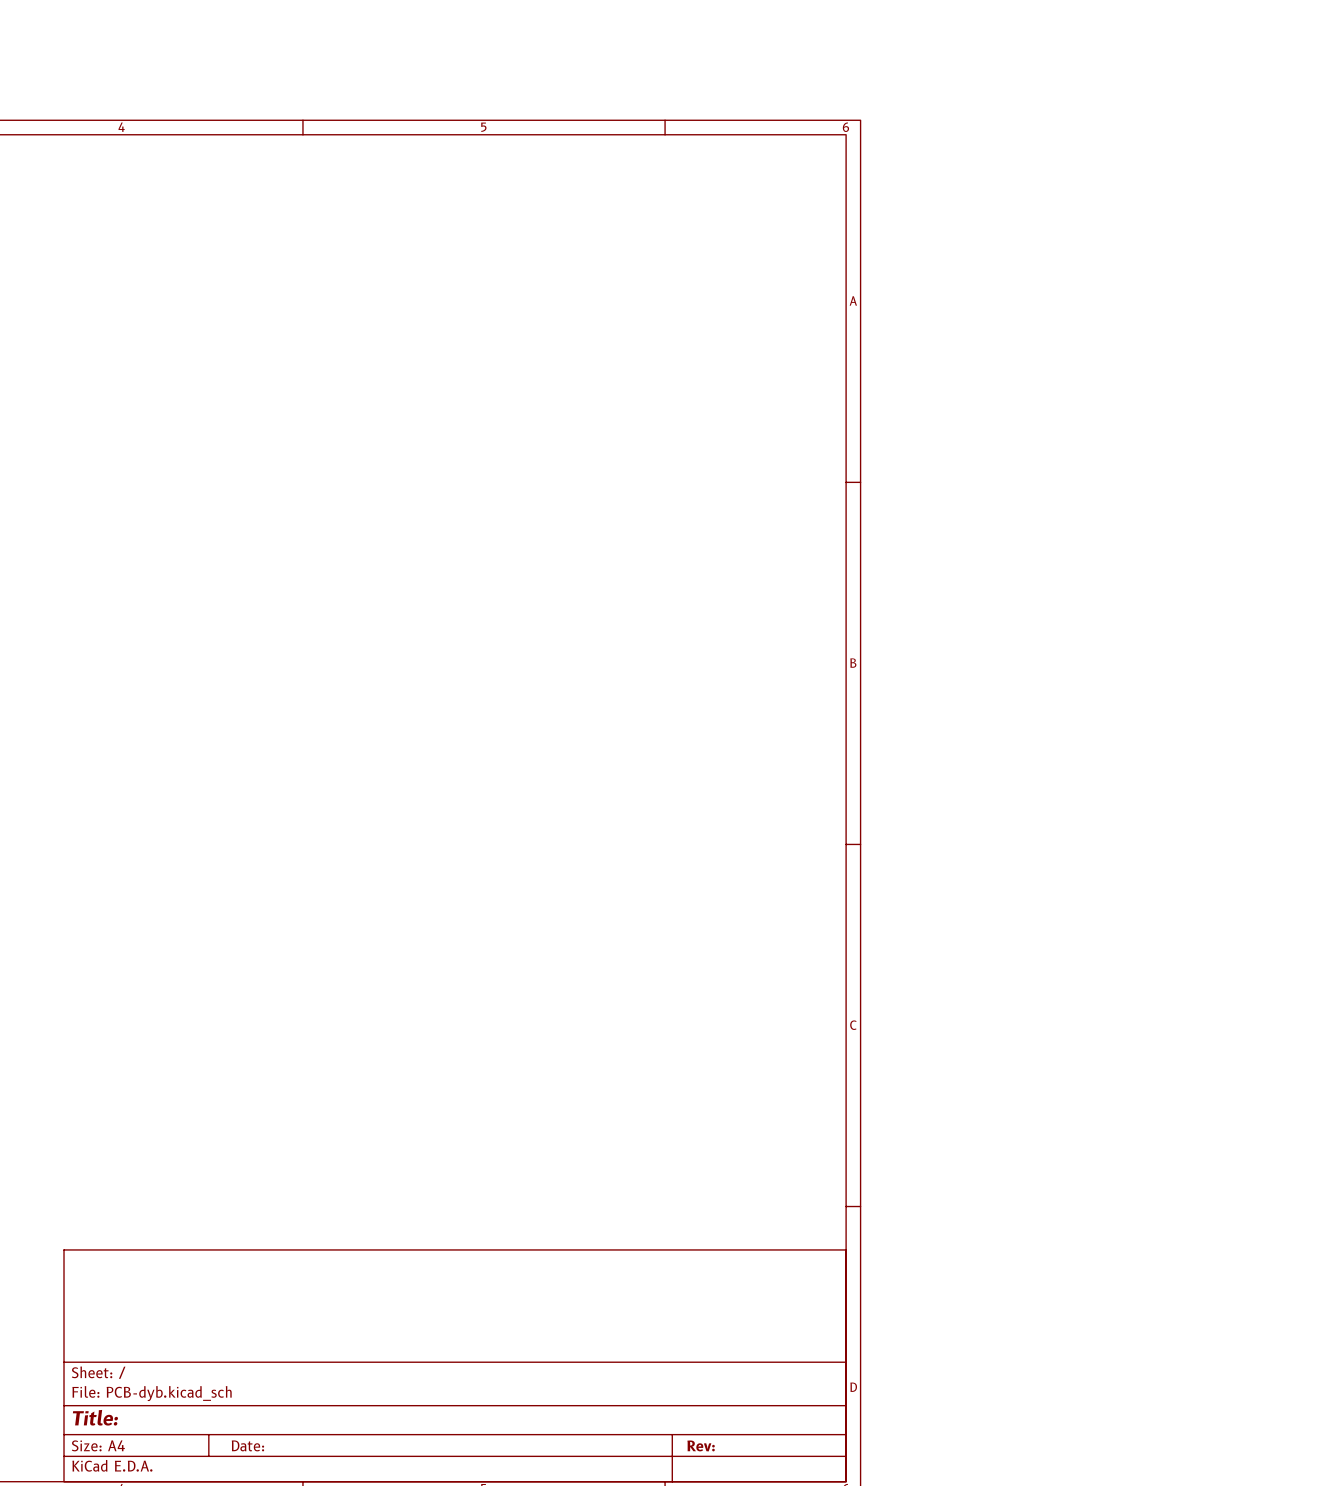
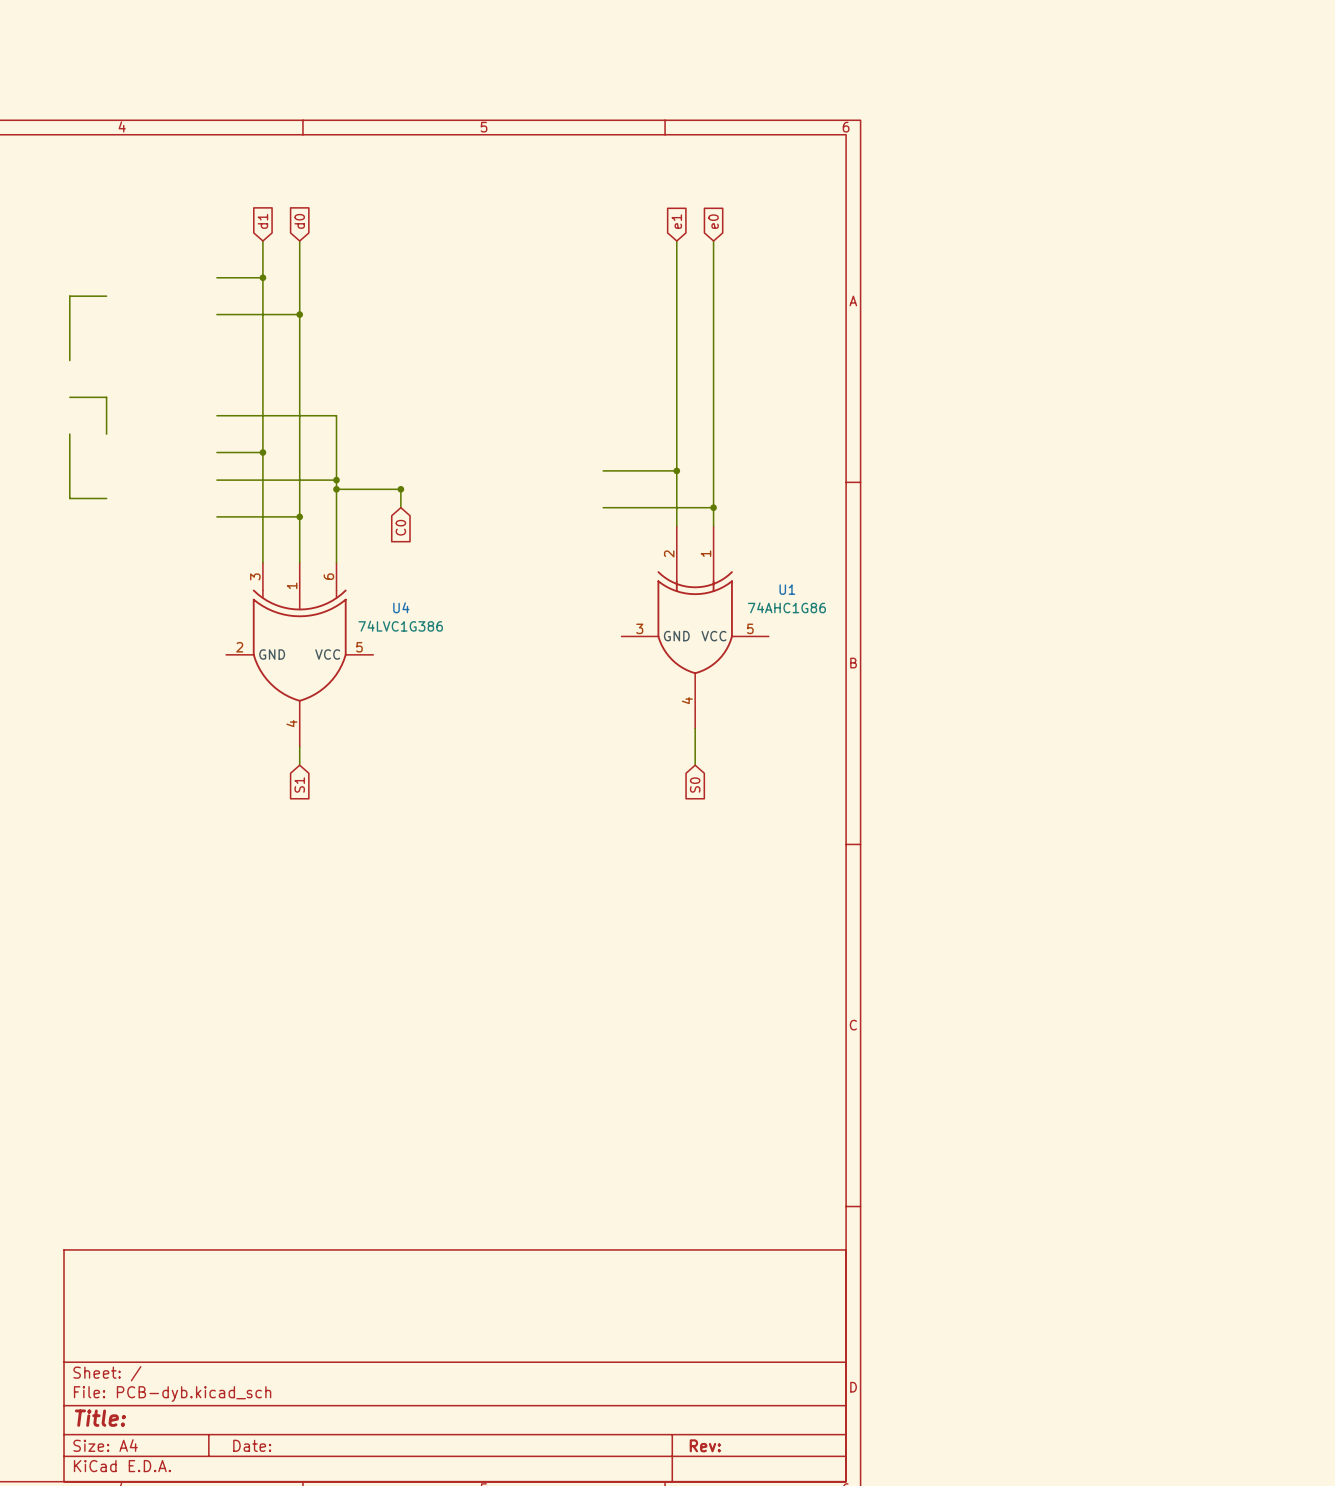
global label: none -> d1 (262, 221)
global label: none -> d0 (299, 221)
global label: none -> e1 (676, 221)
global label: none -> e0 (713, 221)
wire: none -> (262, 240) (262, 562)
wire: none -> (299, 240) (299, 562)
wire: none -> (676, 240) (676, 526)
wire: none -> (713, 240) (713, 526)
wire: none -> (216, 277) (262, 277)
junction: none -> (262, 277)
wire: none -> (106, 296) (69, 296) (69, 360)
wire: none -> (216, 314) (299, 314)
junction: none -> (299, 314)
wire: none -> (69, 397) (106, 397) (106, 434)
wire: none -> (216, 415) (336, 415) (336, 562)
wire: none -> (69, 434) (69, 498) (106, 498)
wire: none -> (216, 452) (262, 452)
junction: none -> (262, 452)
wire: none -> (603, 470) (676, 470)
junction: none -> (676, 470)
wire: none -> (216, 480) (336, 480)
junction: none -> (336, 480)
wire: none -> (336, 489) (400, 489) (400, 507)
junction: none -> (336, 489)
junction: none -> (400, 489)
wire: none -> (603, 507) (713, 507)
junction: none -> (713, 507)
wire: none -> (216, 516) (299, 516)
junction: none -> (299, 516)
global label: none -> C0 (400, 527)
U1: none -> 74AHC1G86 (695, 627)
U4: none -> 74LVC1G386 (299, 654)
wire: none -> (695, 728) (695, 765)
wire: none -> (299, 746) (299, 765)
global label: none -> S1 (299, 785)
global label: none -> S0 (695, 785)

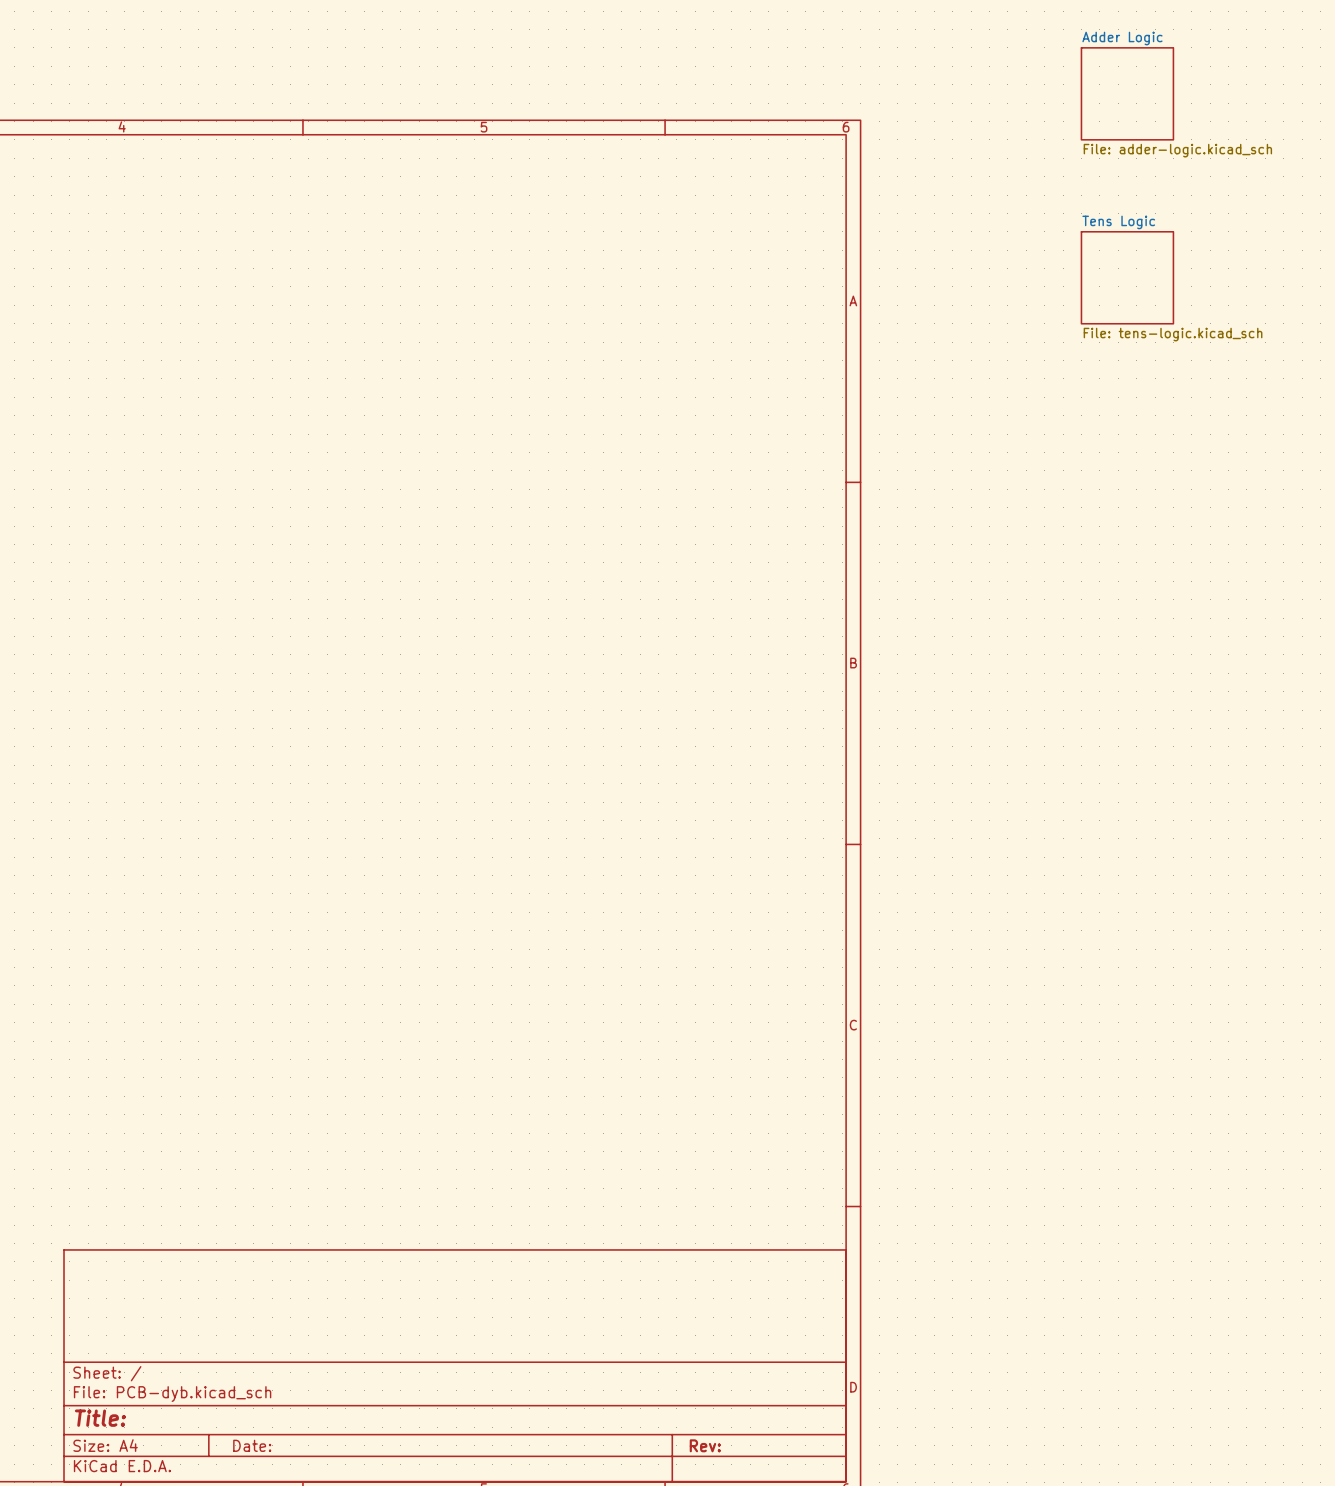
sheet Adder Logic: none -> File: adder-logic.kicad_sch (1127, 93)
global label: d1 (262, 221) -> none
global label: d0 (299, 221) -> none
global label: e1 (676, 221) -> none
global label: e0 (713, 221) -> none
wire: (262, 240) (262, 562) -> none
wire: (299, 240) (299, 562) -> none
wire: (676, 240) (676, 526) -> none
wire: (713, 240) (713, 526) -> none
wire: (216, 277) (262, 277) -> none
junction: (262, 277) -> none
sheet Tens Logic: none -> File: tens-logic.kicad_sch (1127, 277)
wire: (106, 296) (69, 296) (69, 360) -> none
wire: (216, 314) (299, 314) -> none
junction: (299, 314) -> none
wire: (69, 397) (106, 397) (106, 434) -> none
wire: (216, 415) (336, 415) (336, 562) -> none
wire: (69, 434) (69, 498) (106, 498) -> none
wire: (216, 452) (262, 452) -> none
junction: (262, 452) -> none
wire: (603, 470) (676, 470) -> none
junction: (676, 470) -> none
wire: (216, 480) (336, 480) -> none
junction: (336, 480) -> none
wire: (336, 489) (400, 489) (400, 507) -> none
junction: (336, 489) -> none
junction: (400, 489) -> none
wire: (603, 507) (713, 507) -> none
junction: (713, 507) -> none
wire: (216, 516) (299, 516) -> none
junction: (299, 516) -> none
global label: C0 (400, 527) -> none
U1: 74AHC1G86 (695, 627) -> none
U4: 74LVC1G386 (299, 654) -> none
wire: (695, 728) (695, 765) -> none
wire: (299, 746) (299, 765) -> none
global label: S1 (299, 785) -> none
global label: S0 (695, 785) -> none

